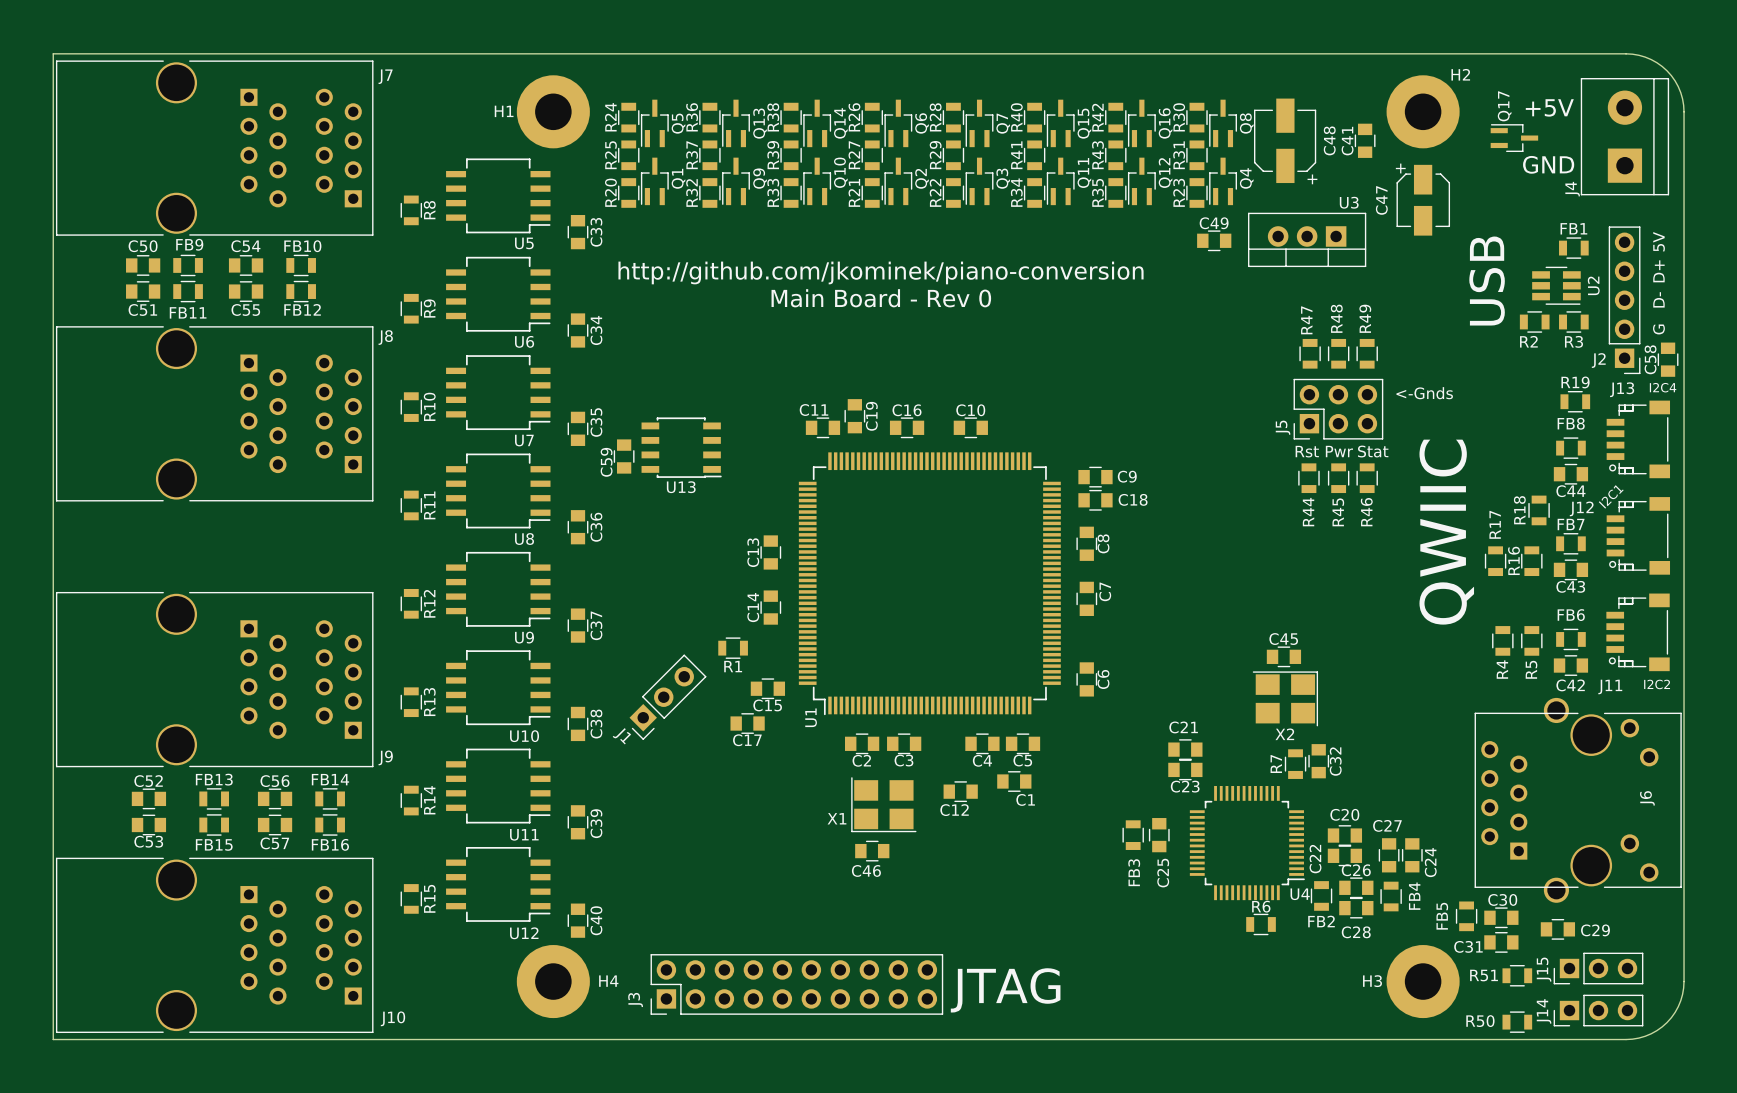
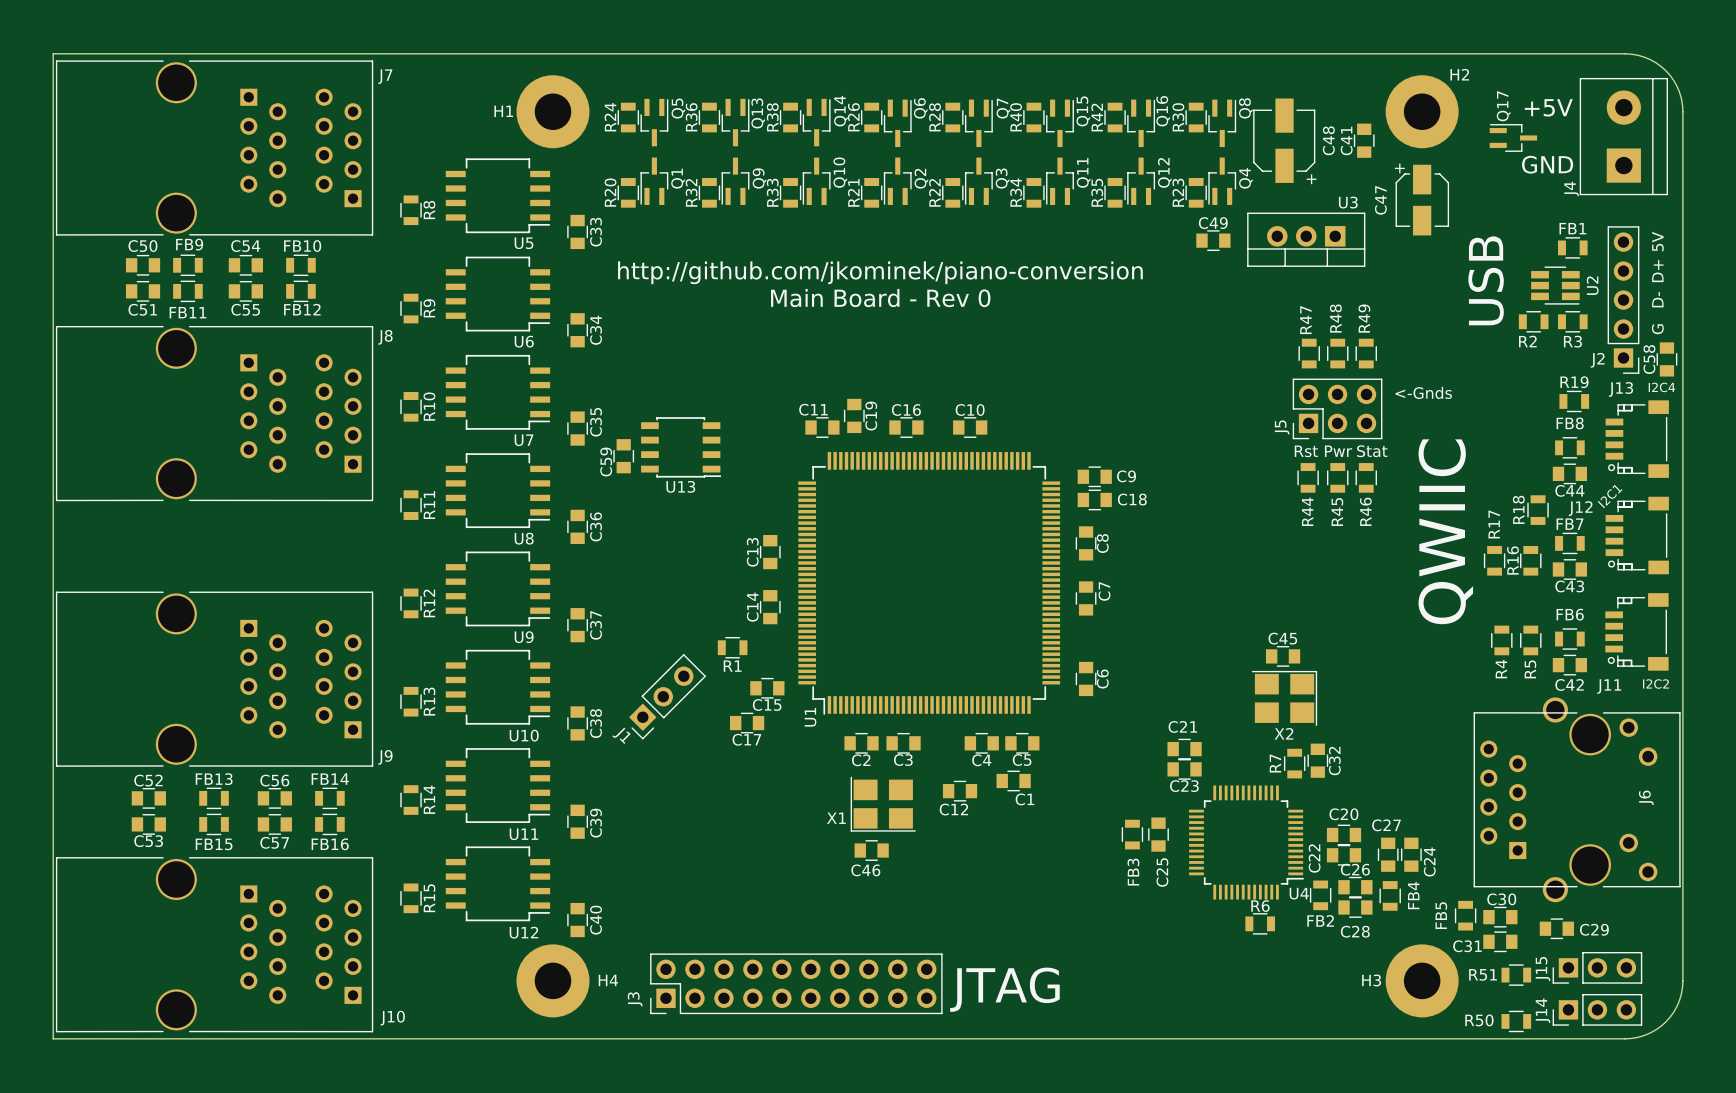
Q5 rotation: 0° (654, 123) -> 180° (654, 122)
Q13 rotation: 0° (735, 123) -> 180° (735, 122)
Q14 rotation: 0° (817, 123) -> 180° (816, 122)
Q6 rotation: 0° (898, 123) -> 180° (897, 123)
Q7 rotation: 0° (979, 123) -> 180° (978, 123)
Q15 rotation: 0° (1060, 123) -> 180° (1060, 123)
Q16 rotation: 0° (1141, 123) -> 180° (1141, 123)
Q8 rotation: 0° (1223, 123) -> 180° (1222, 123)
R25: (628, 155) -> none
R37: (709, 155) -> none
R39: (791, 155) -> none
R27: (872, 155) -> none
R29: (953, 155) -> none
R41: (1034, 155) -> none
R43: (1115, 155) -> none
R31: (1196, 155) -> none

